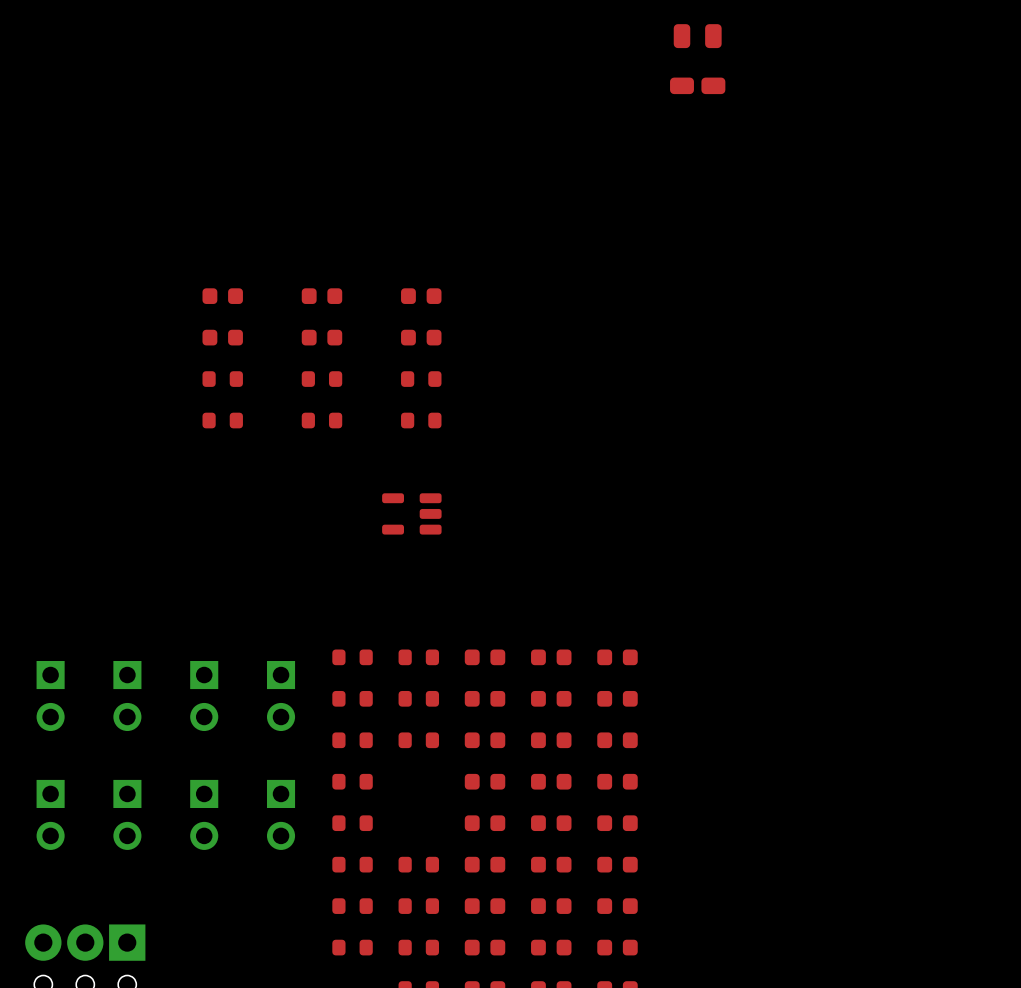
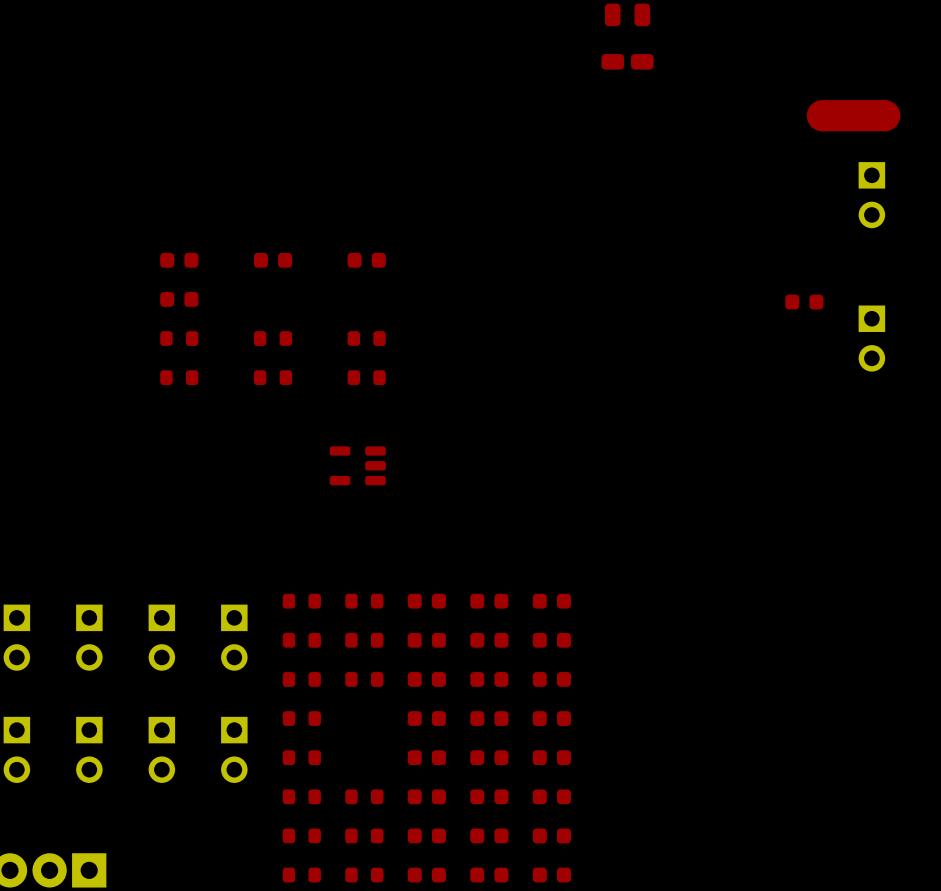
part: none -> (853, 115)
part: none -> (871, 195)
part: (321, 337) -> none
part: (421, 337) -> none
part: none -> (804, 302)
part: none -> (871, 338)

